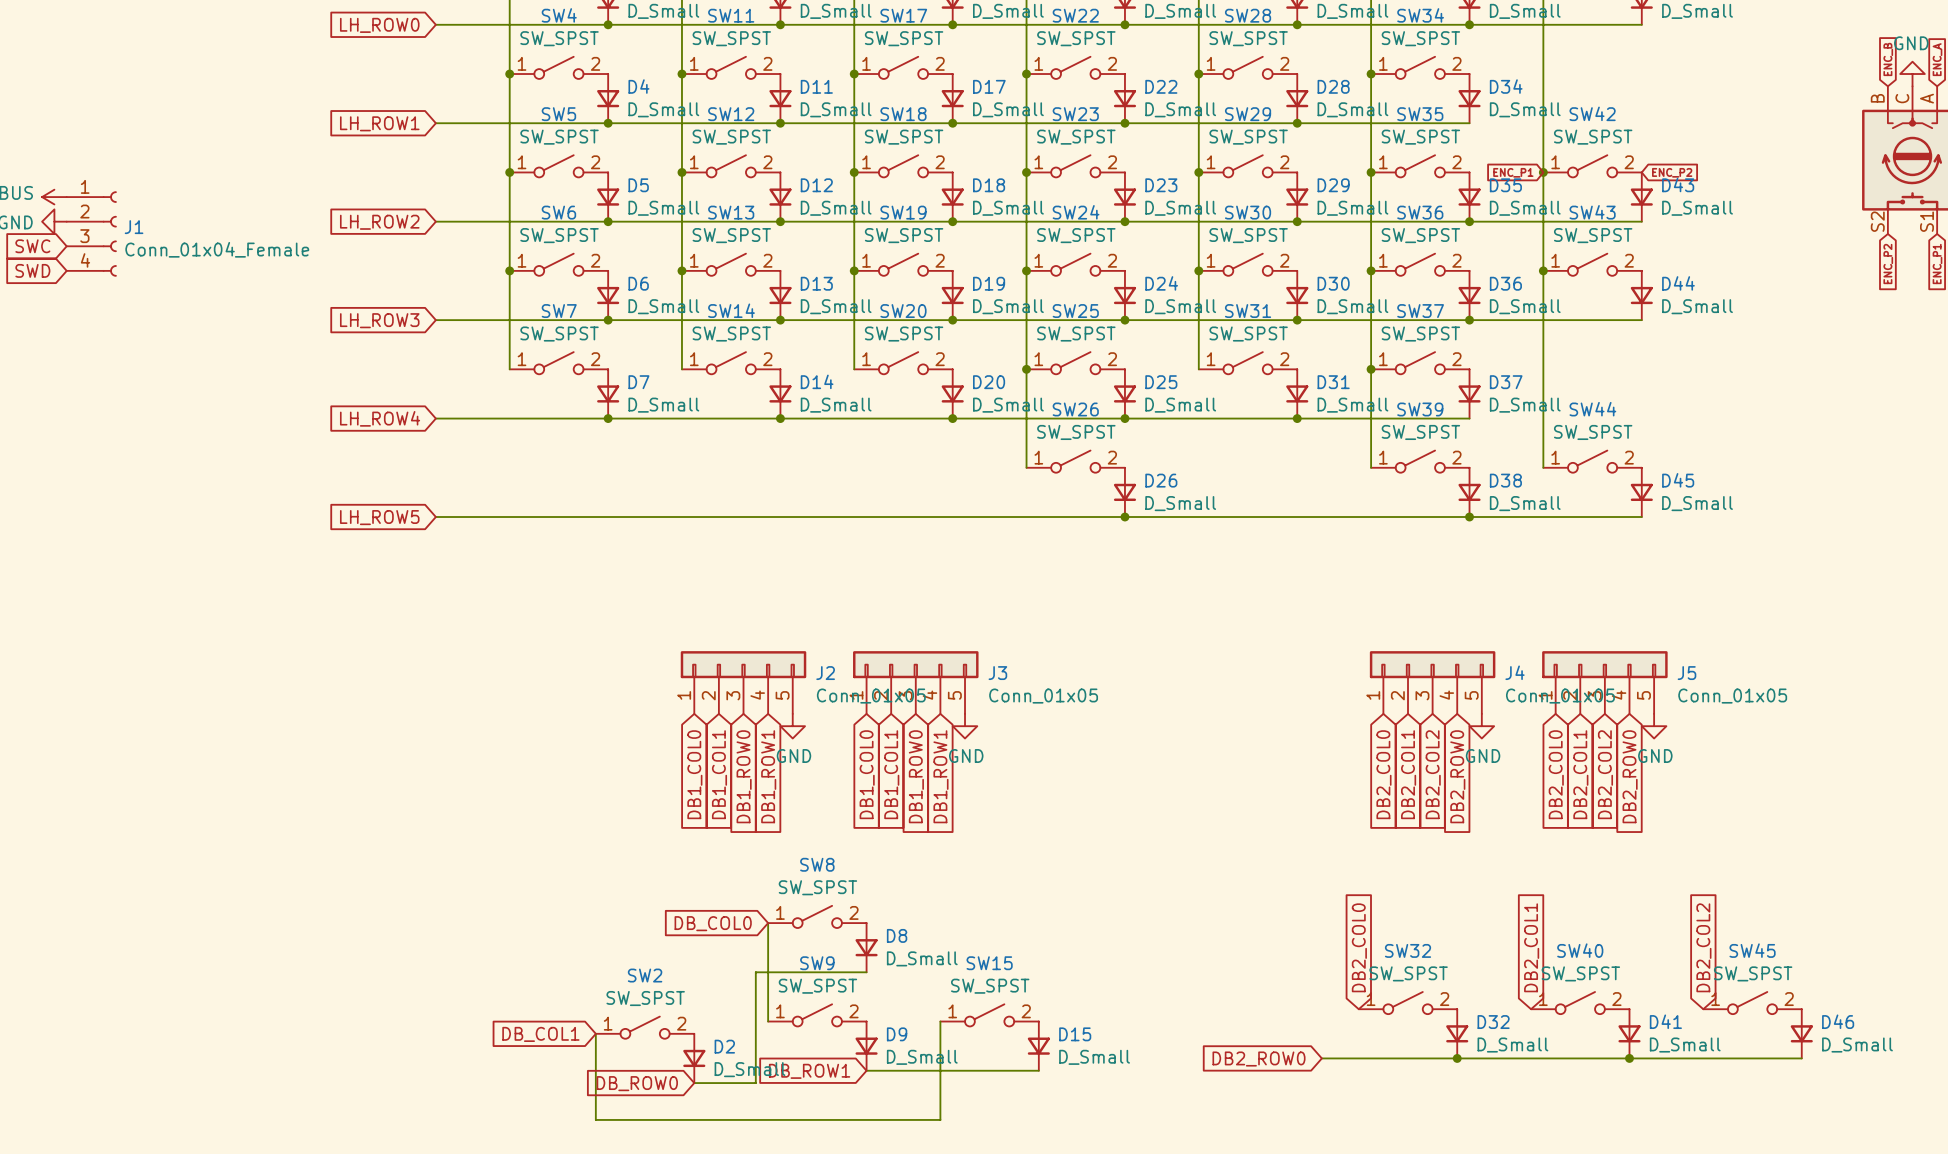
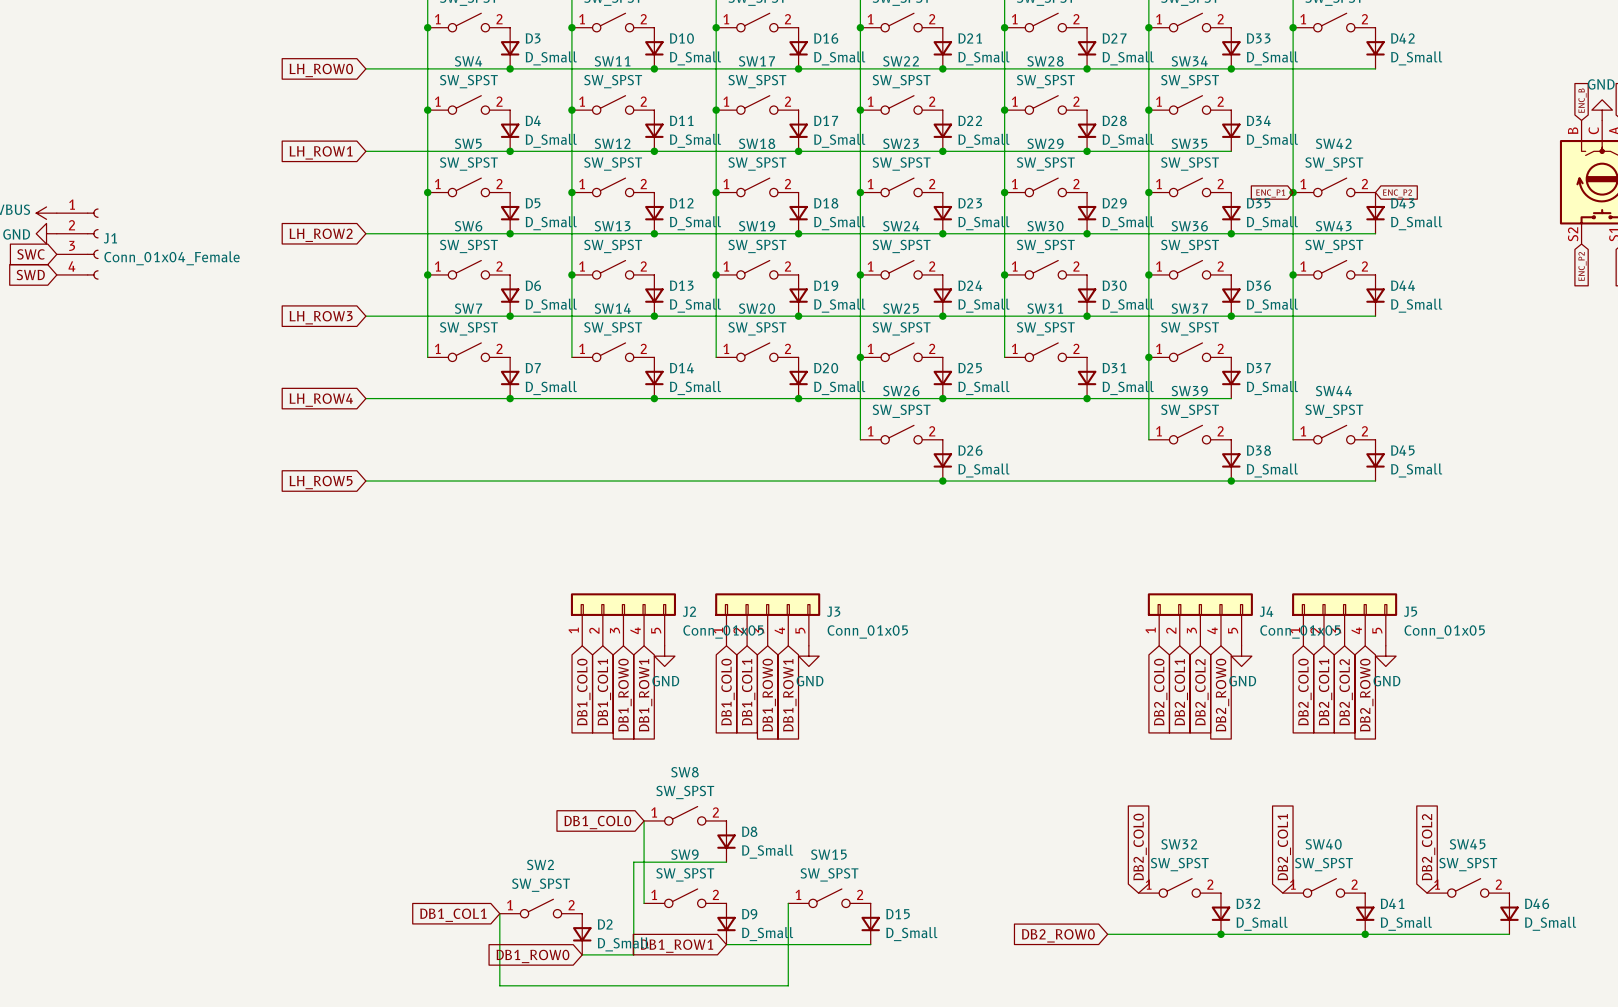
global label: DB_COL0 (713, 923) -> DB1_COL0 (597, 822)
global label: DB_COL1 (540, 1034) -> DB1_COL1 (453, 915)
global label: DB_ROW1 (809, 1071) -> DB1_ROW1 (677, 946)
global label: DB_ROW0 (637, 1083) -> DB1_ROW0 (532, 956)

